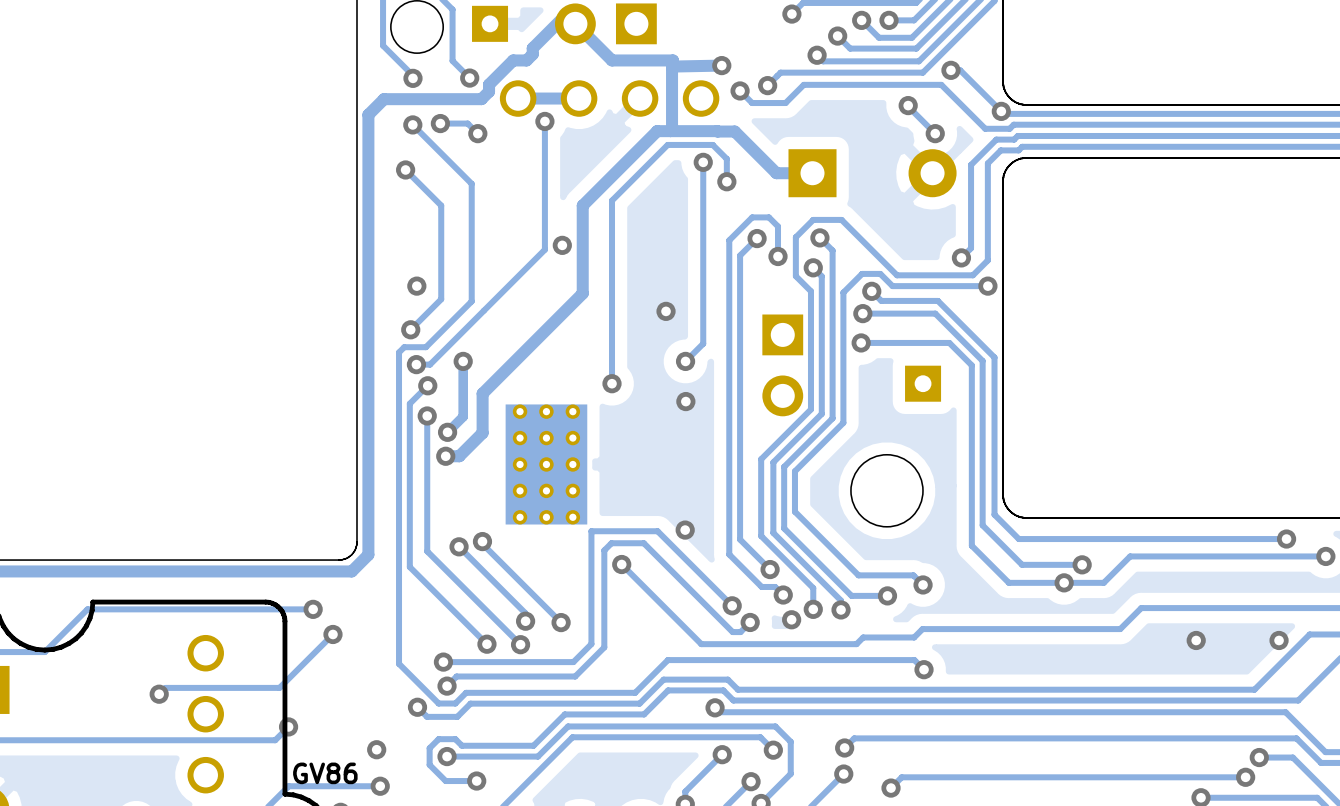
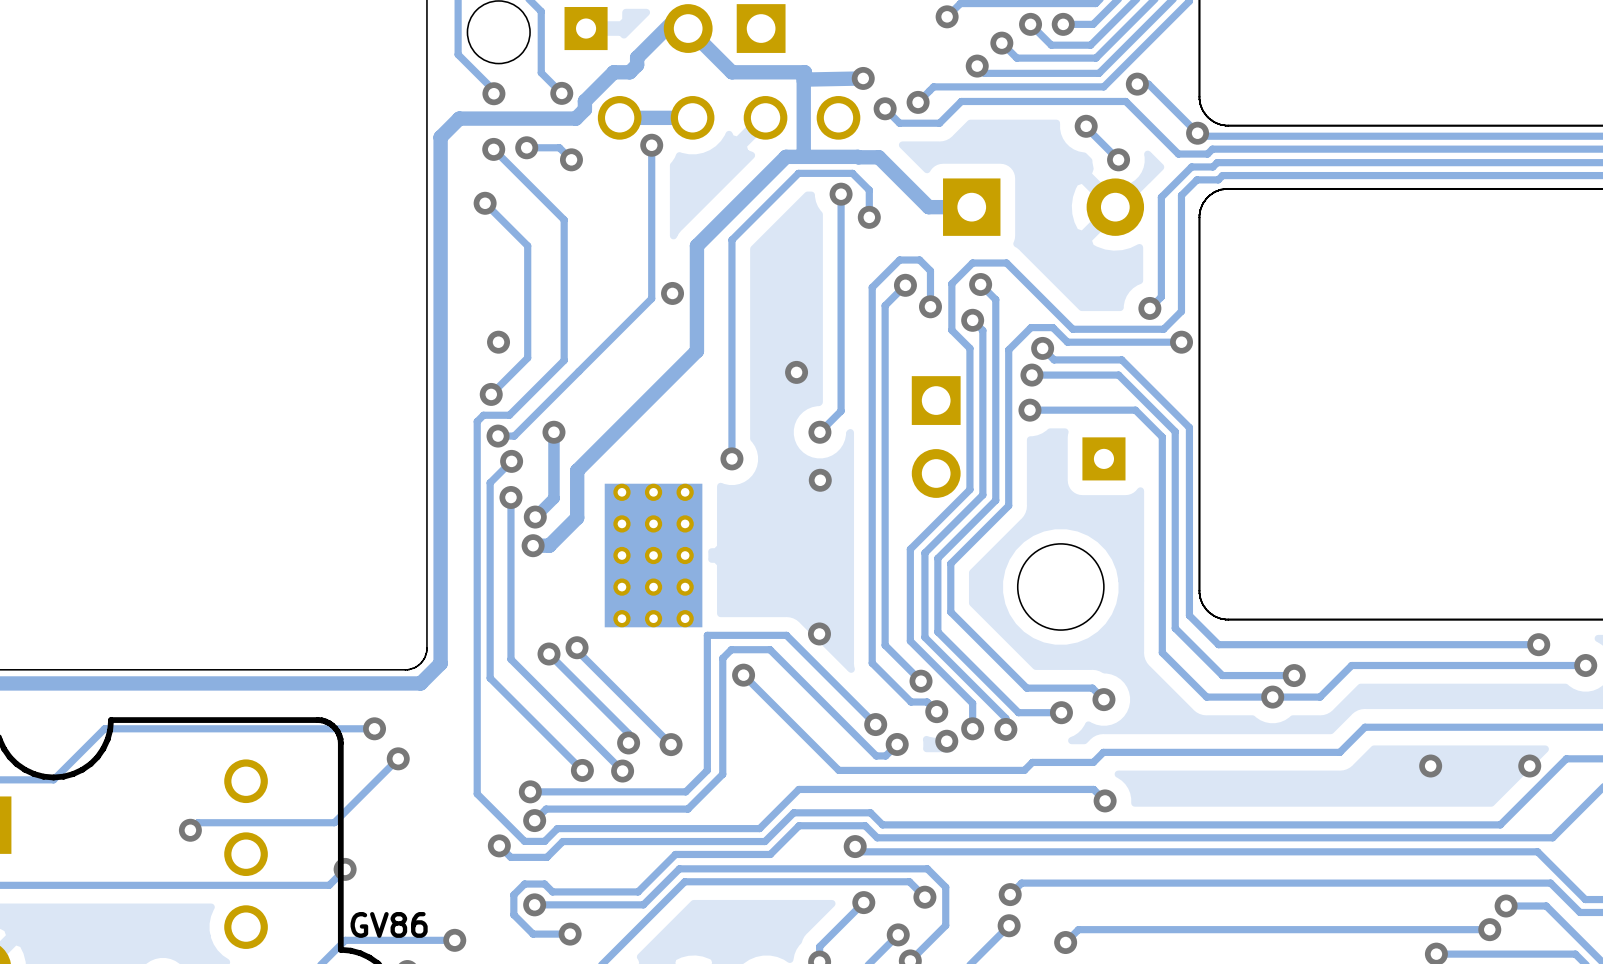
via: (376, 749) -> none

